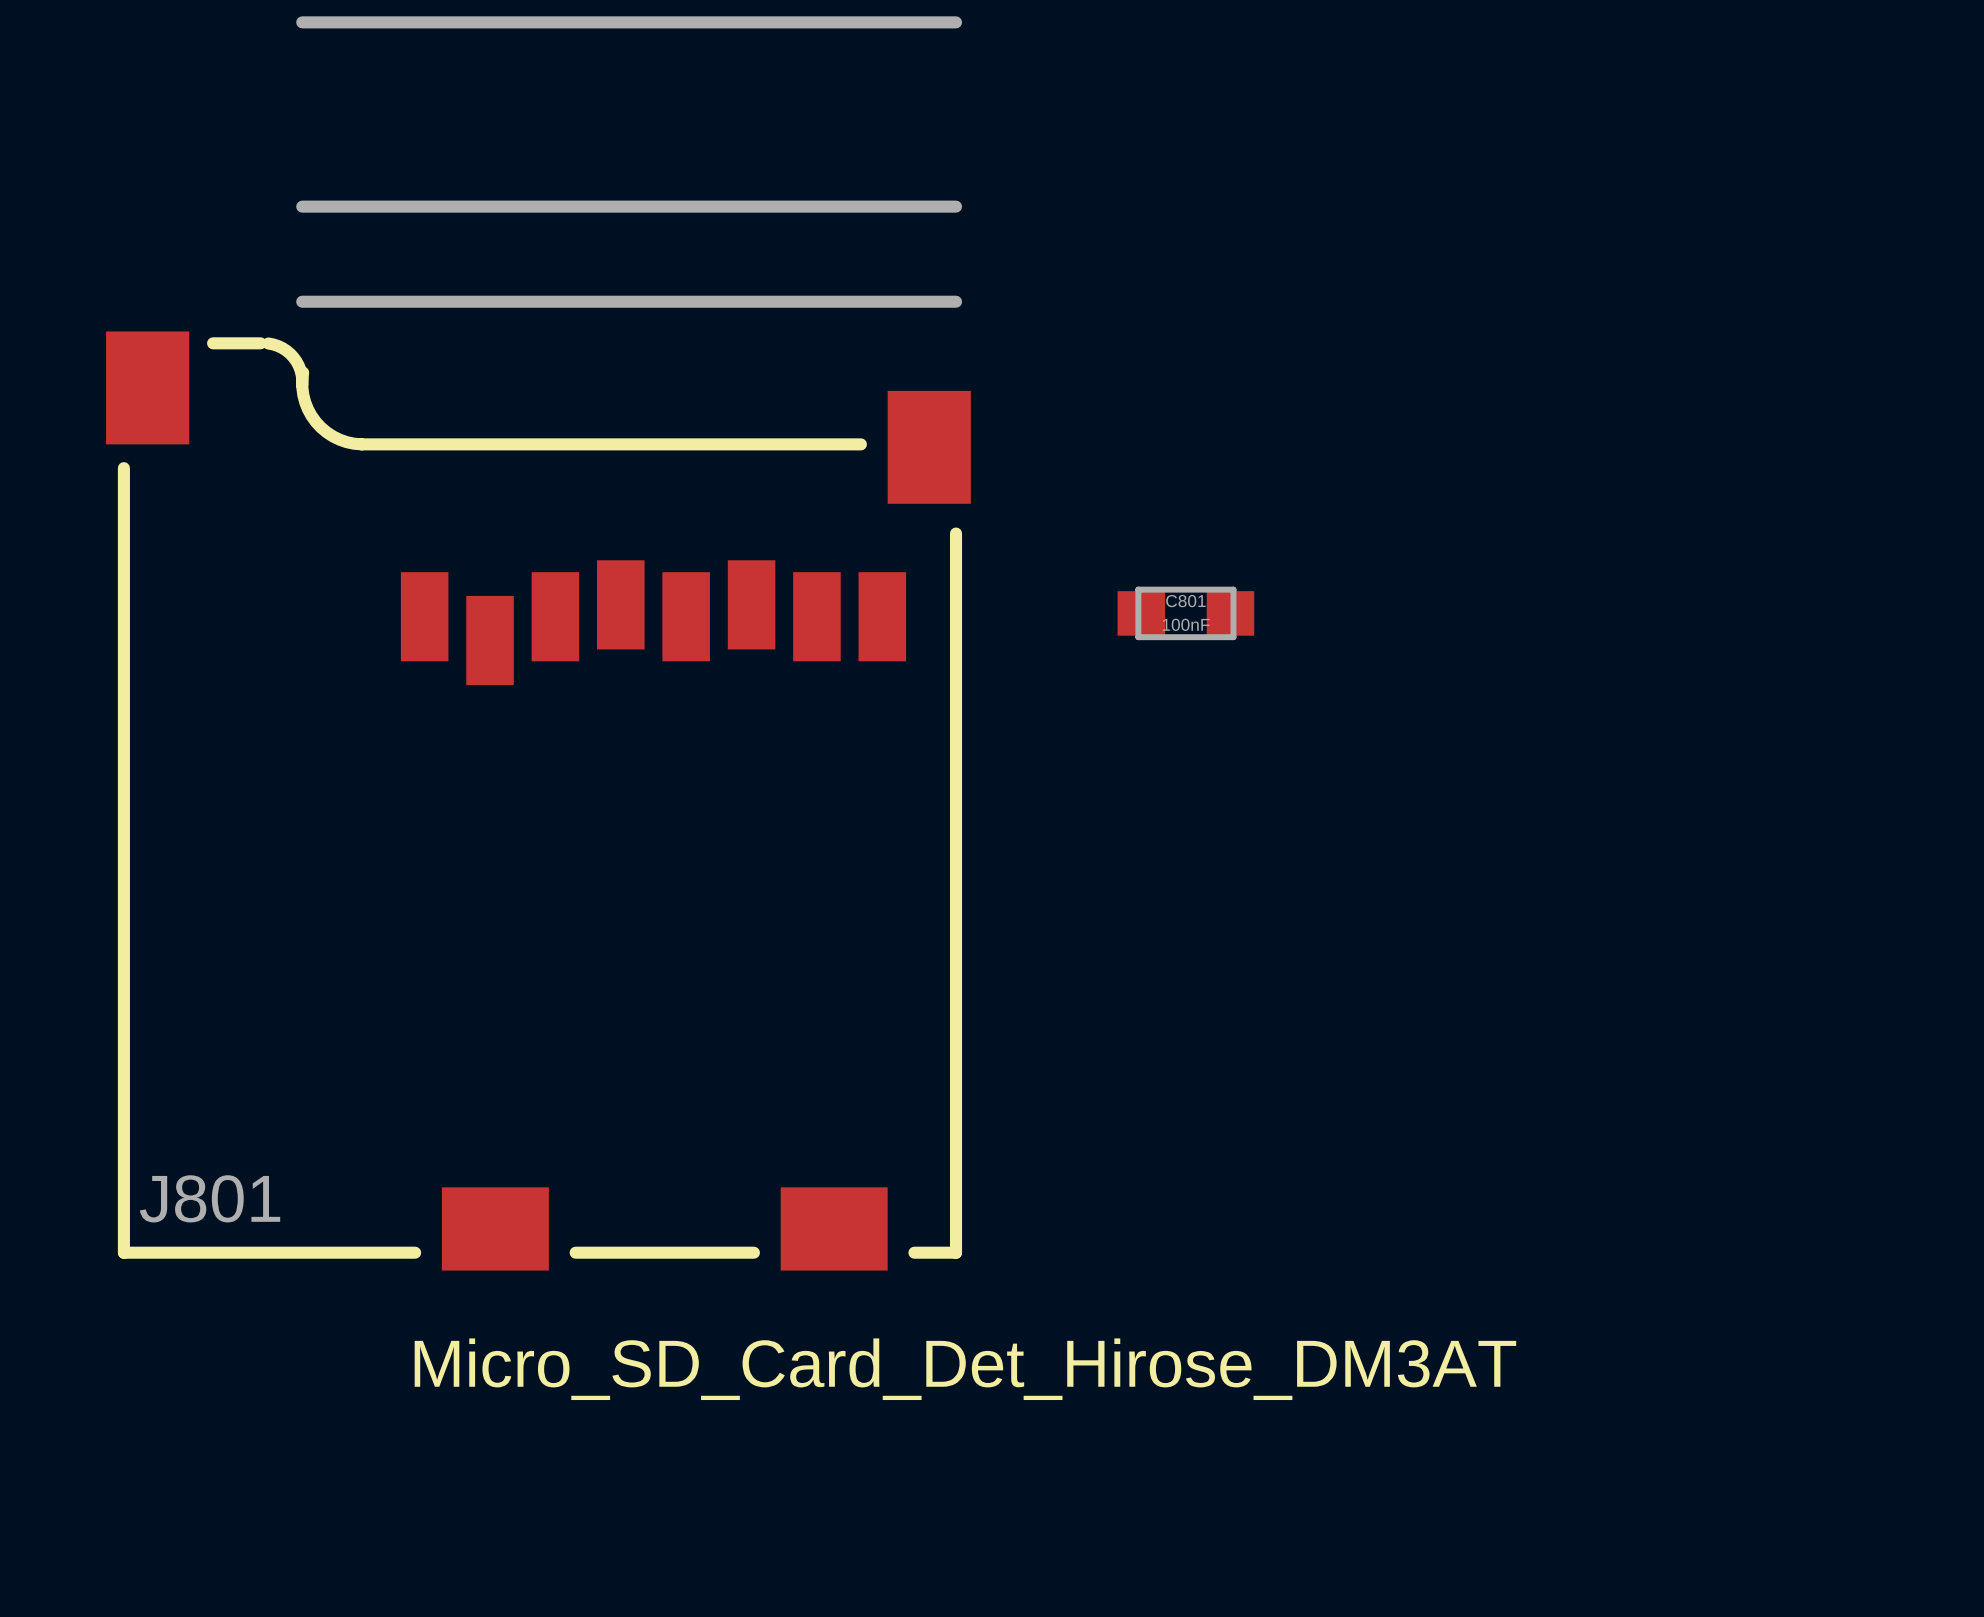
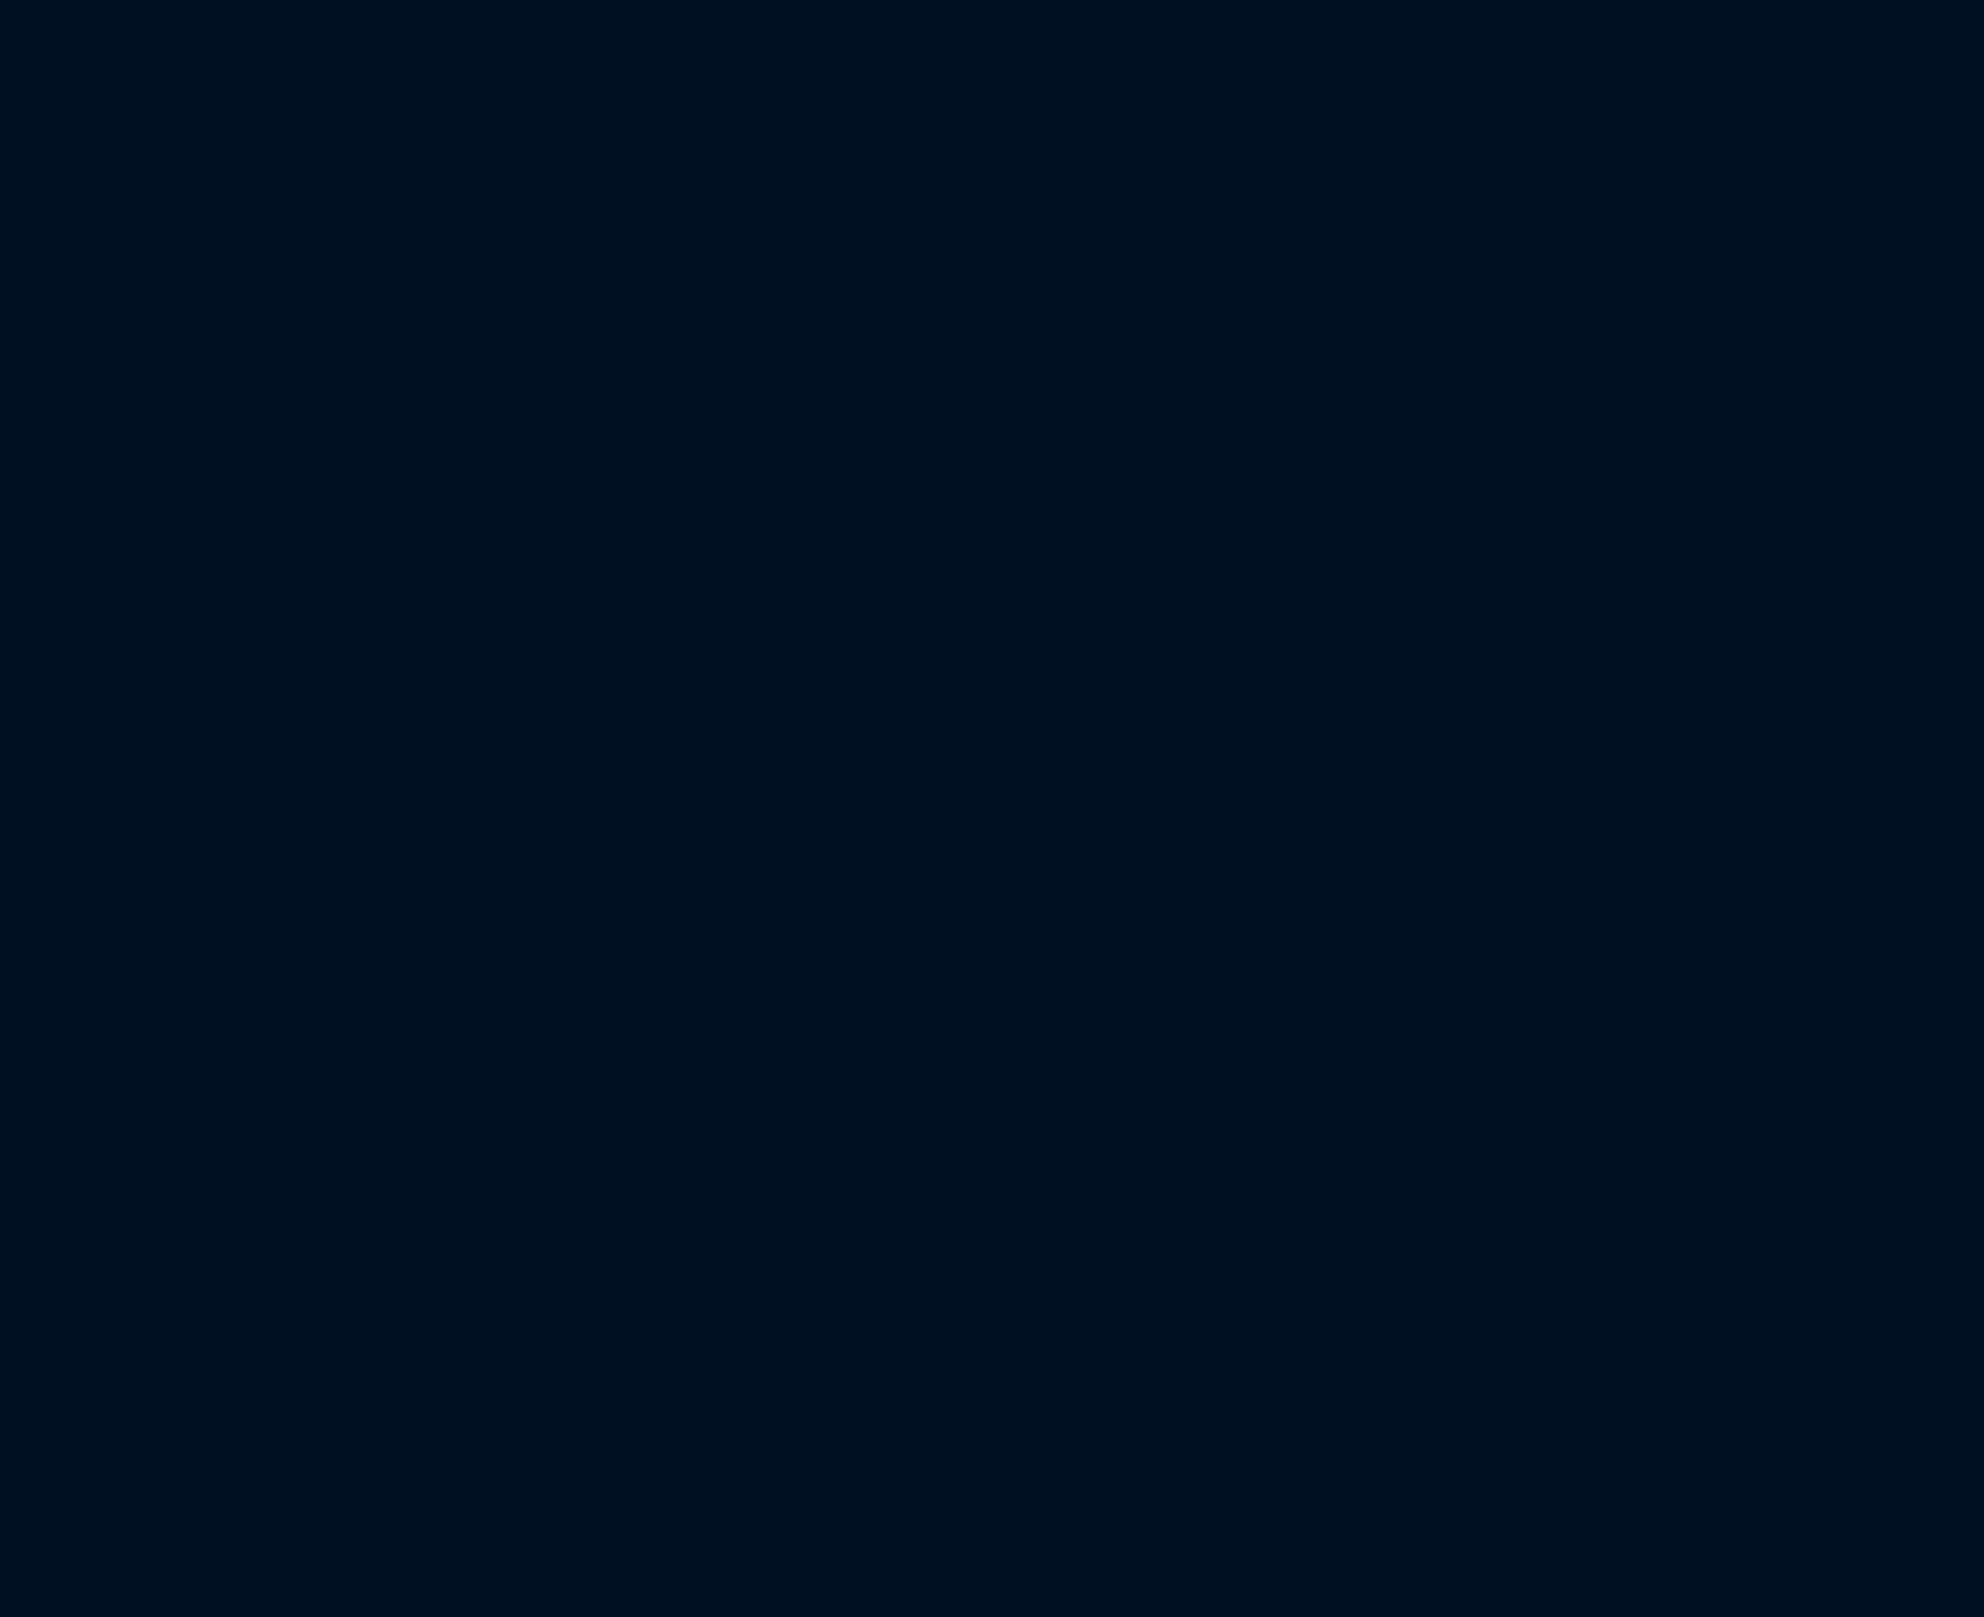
C801: 100nF (1185, 613) -> none
J801: Micro_SD_Card_Det_Hirose_DM3AT (538, 643) -> none

